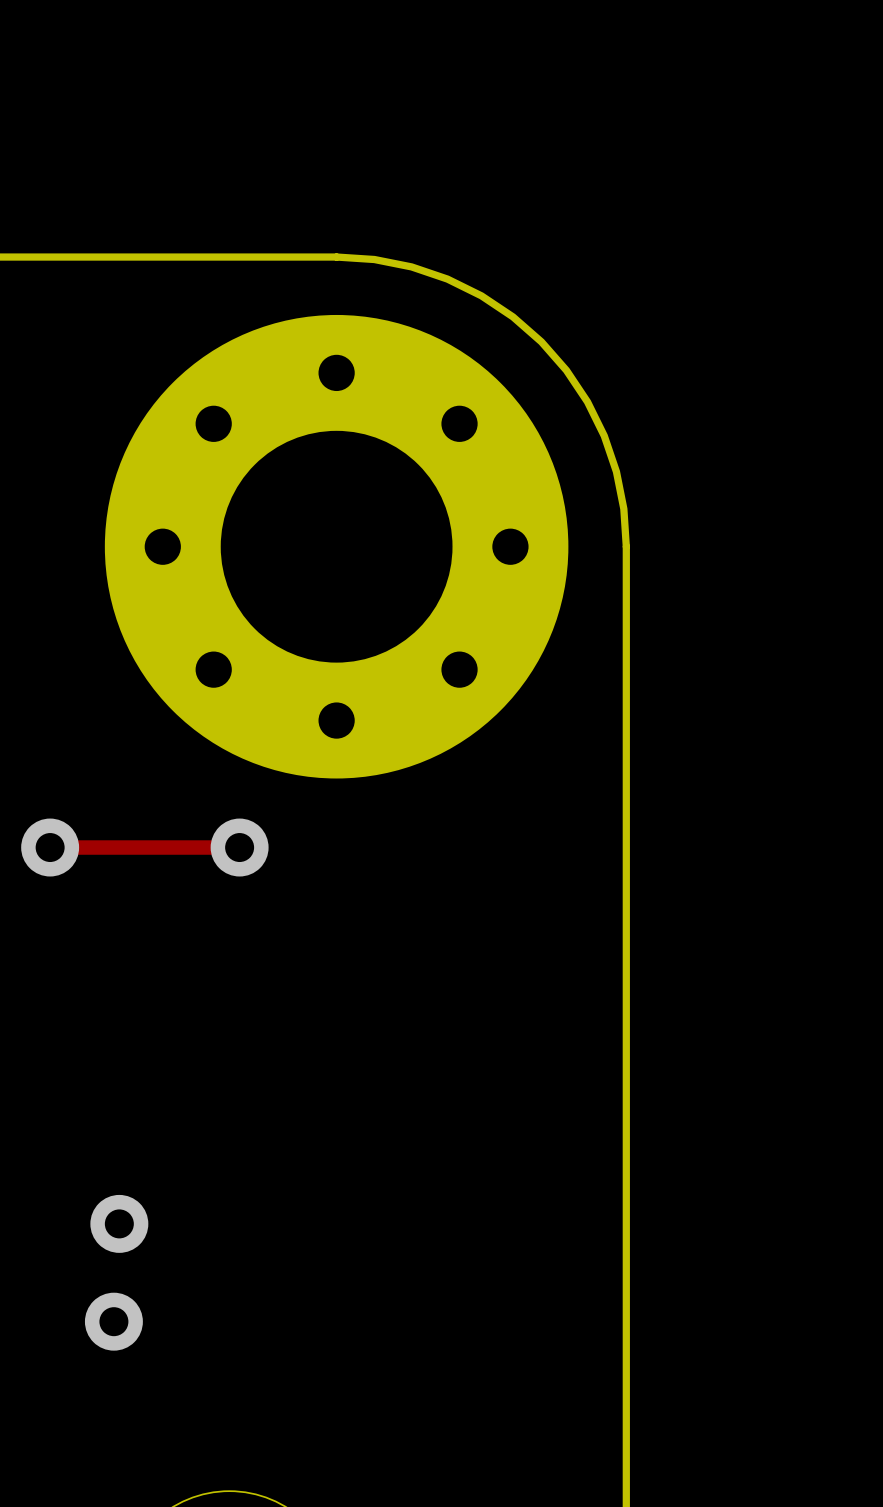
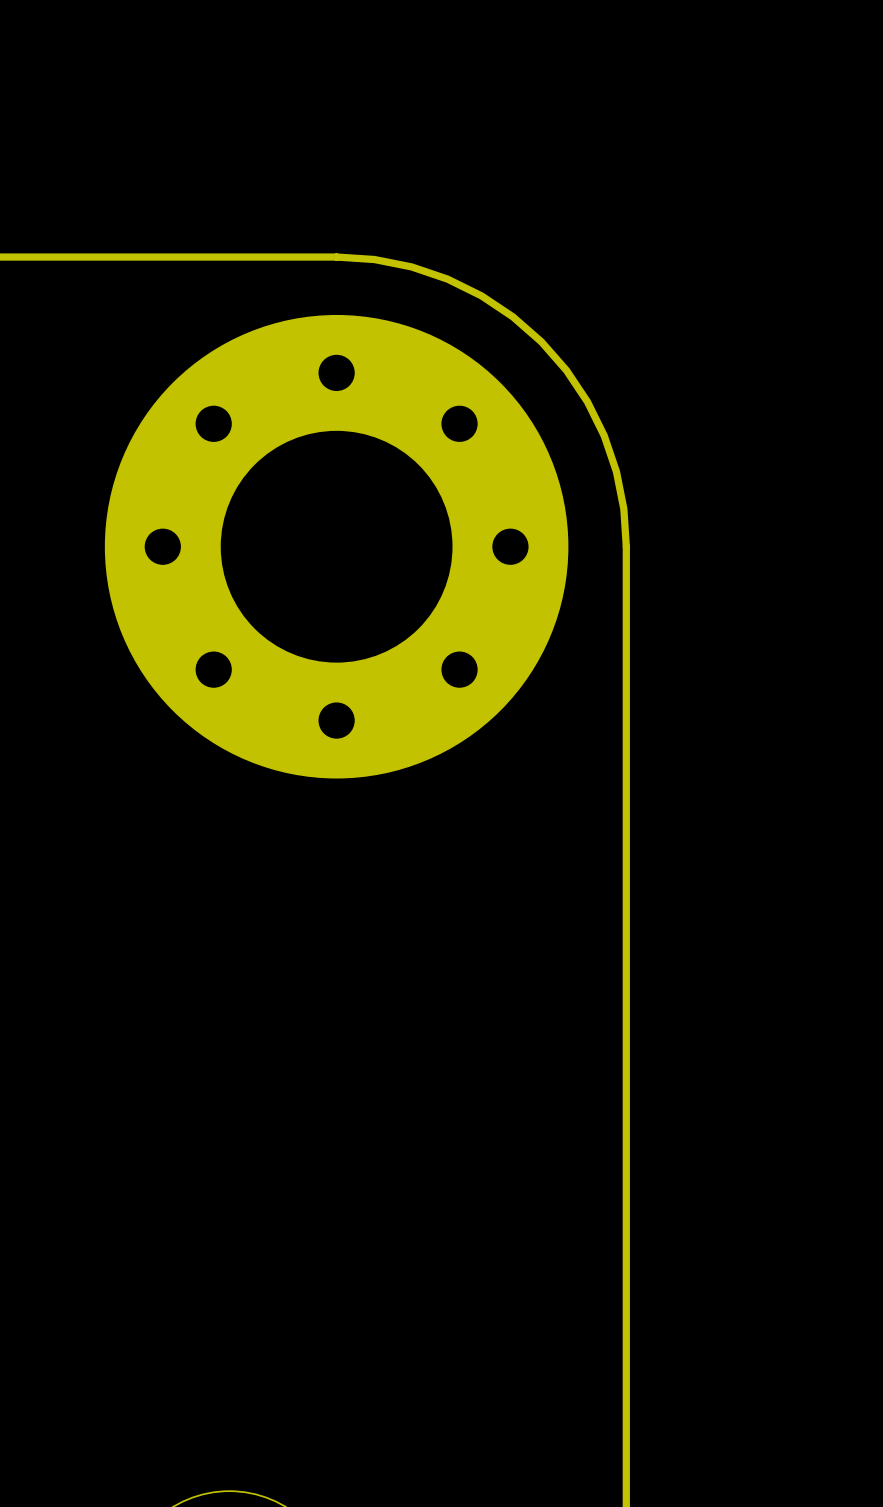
track: (50, 847) (239, 847) -> none
via: (50, 847) -> none
via: (239, 847) -> none
via: (119, 1223) -> none
via: (113, 1321) -> none

